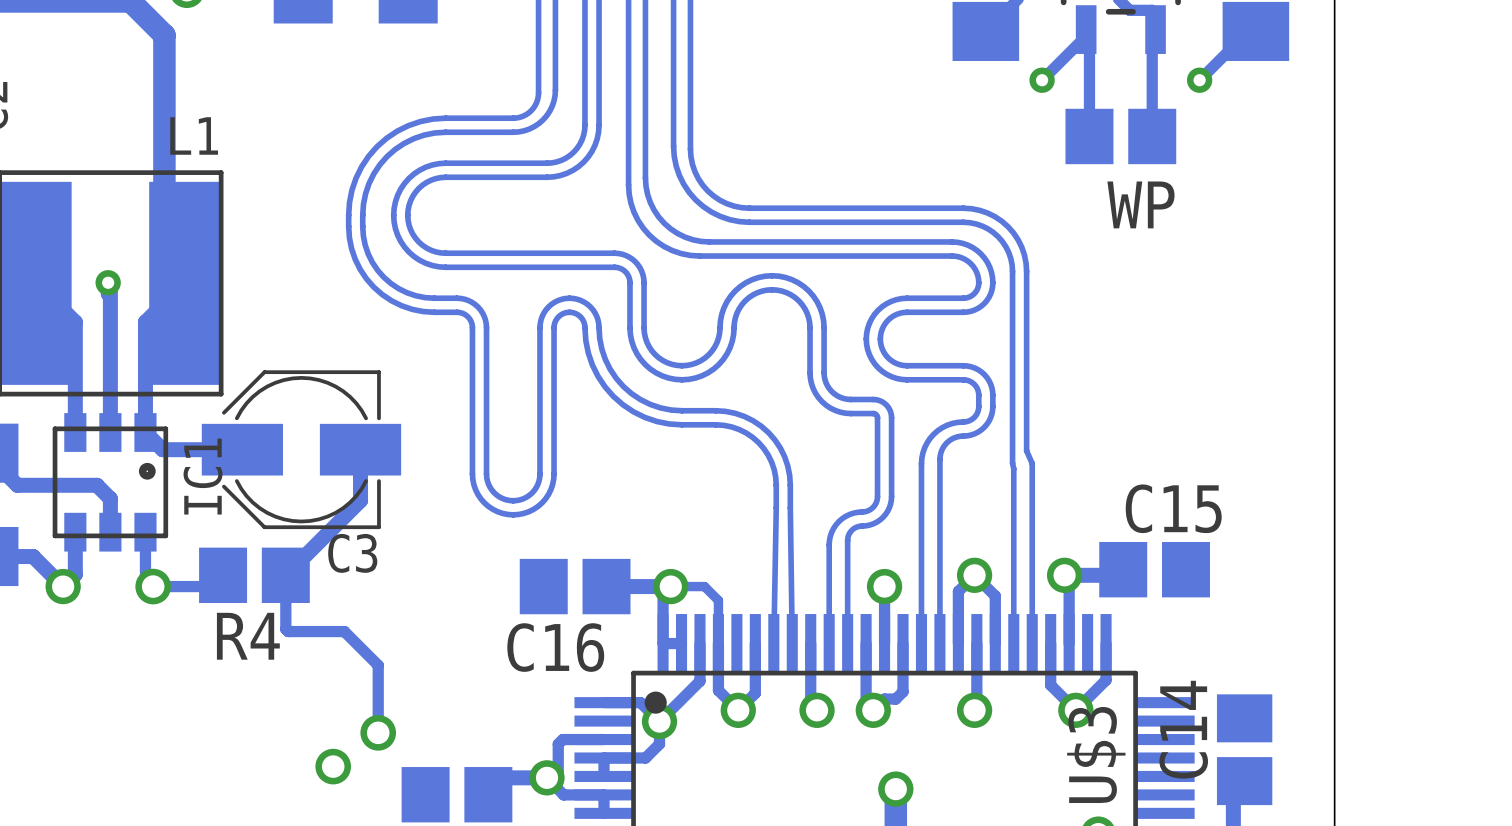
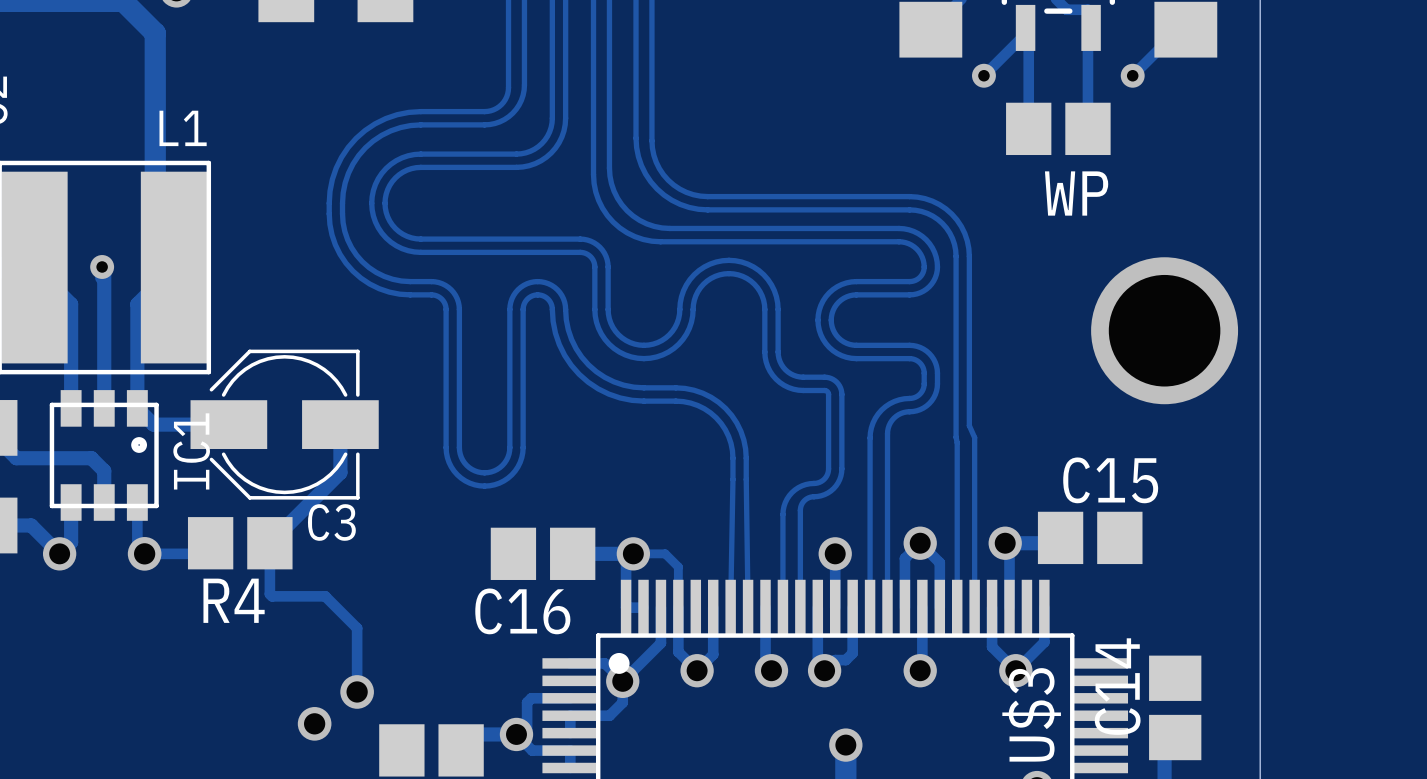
via: none -> (1164, 330)

